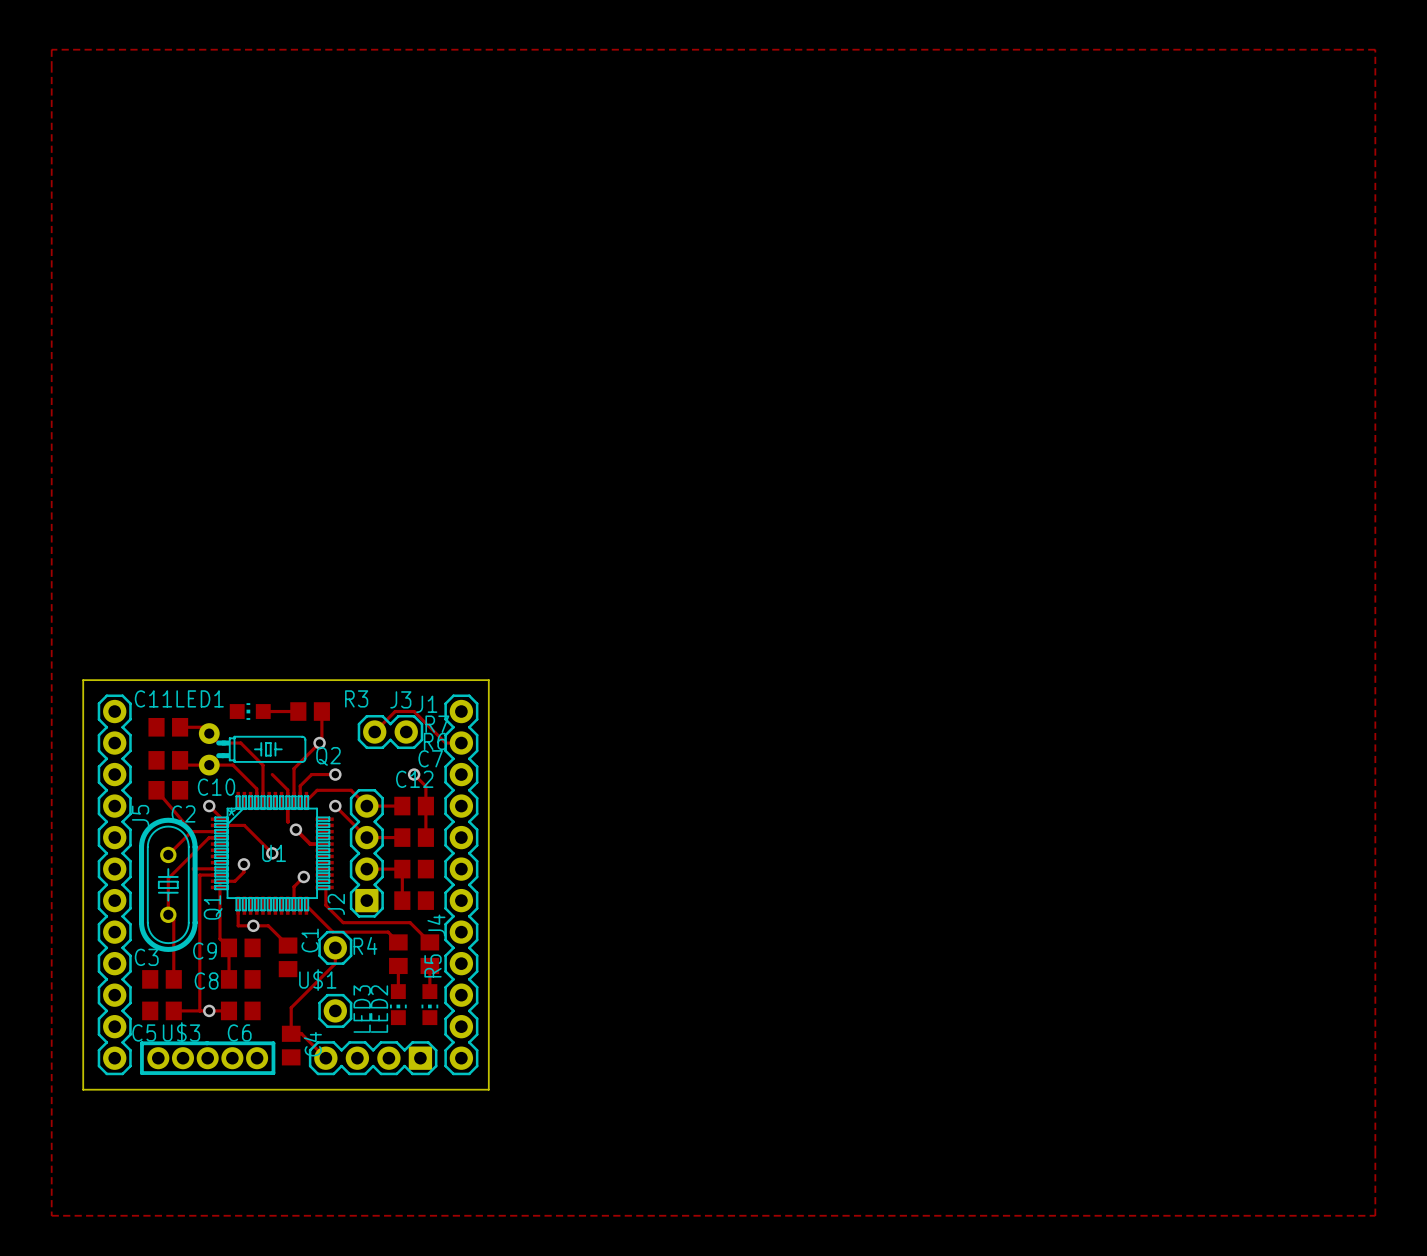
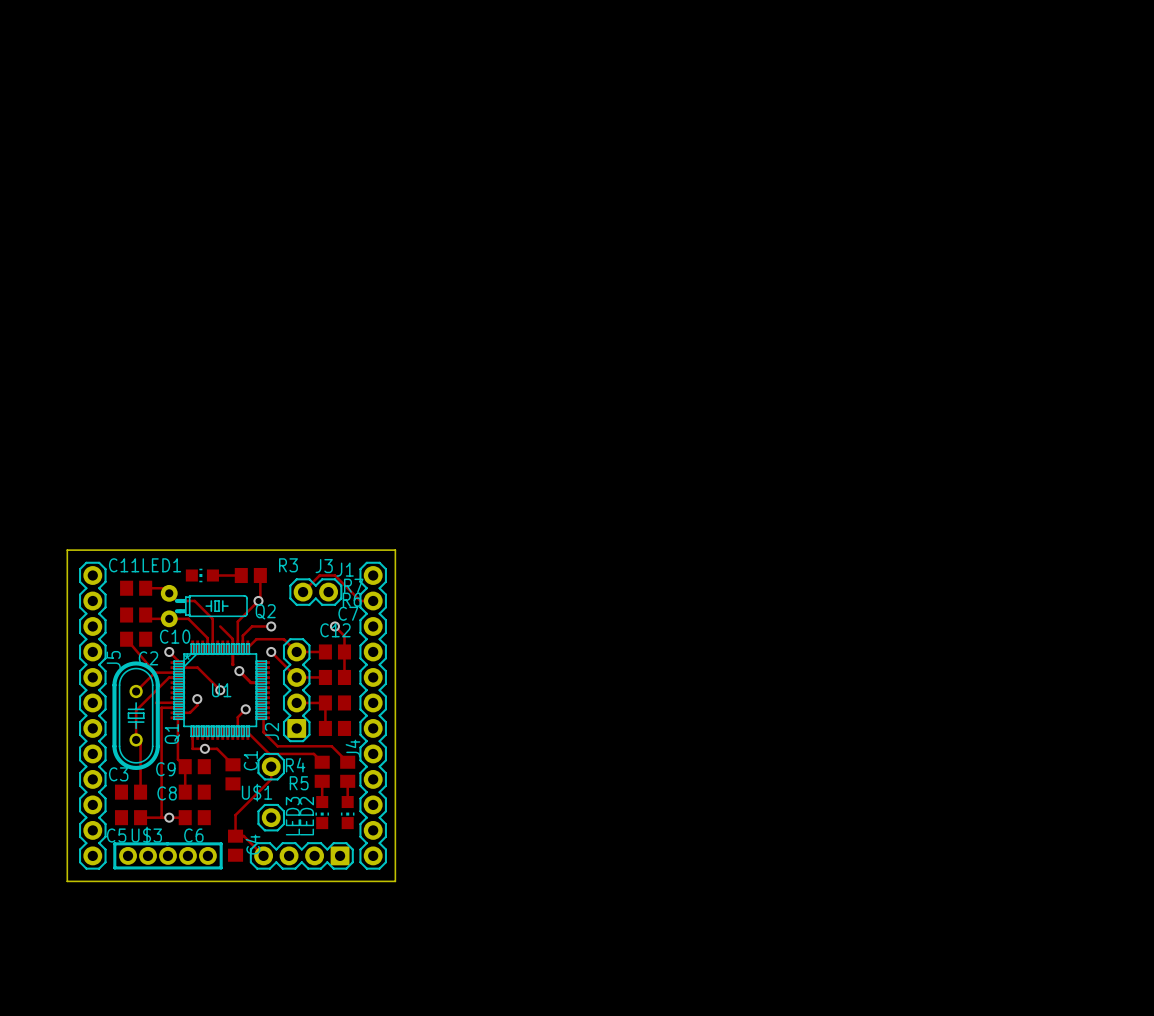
zone outline: (51, 49) (51, 1215) (1375, 1215) (1375, 49) (51, 49) -> none
R5 name rotation: 0° (433, 965) -> 90° clockwise (299, 783)
R5 name position: R5 (433, 965) -> R5 (299, 783)

